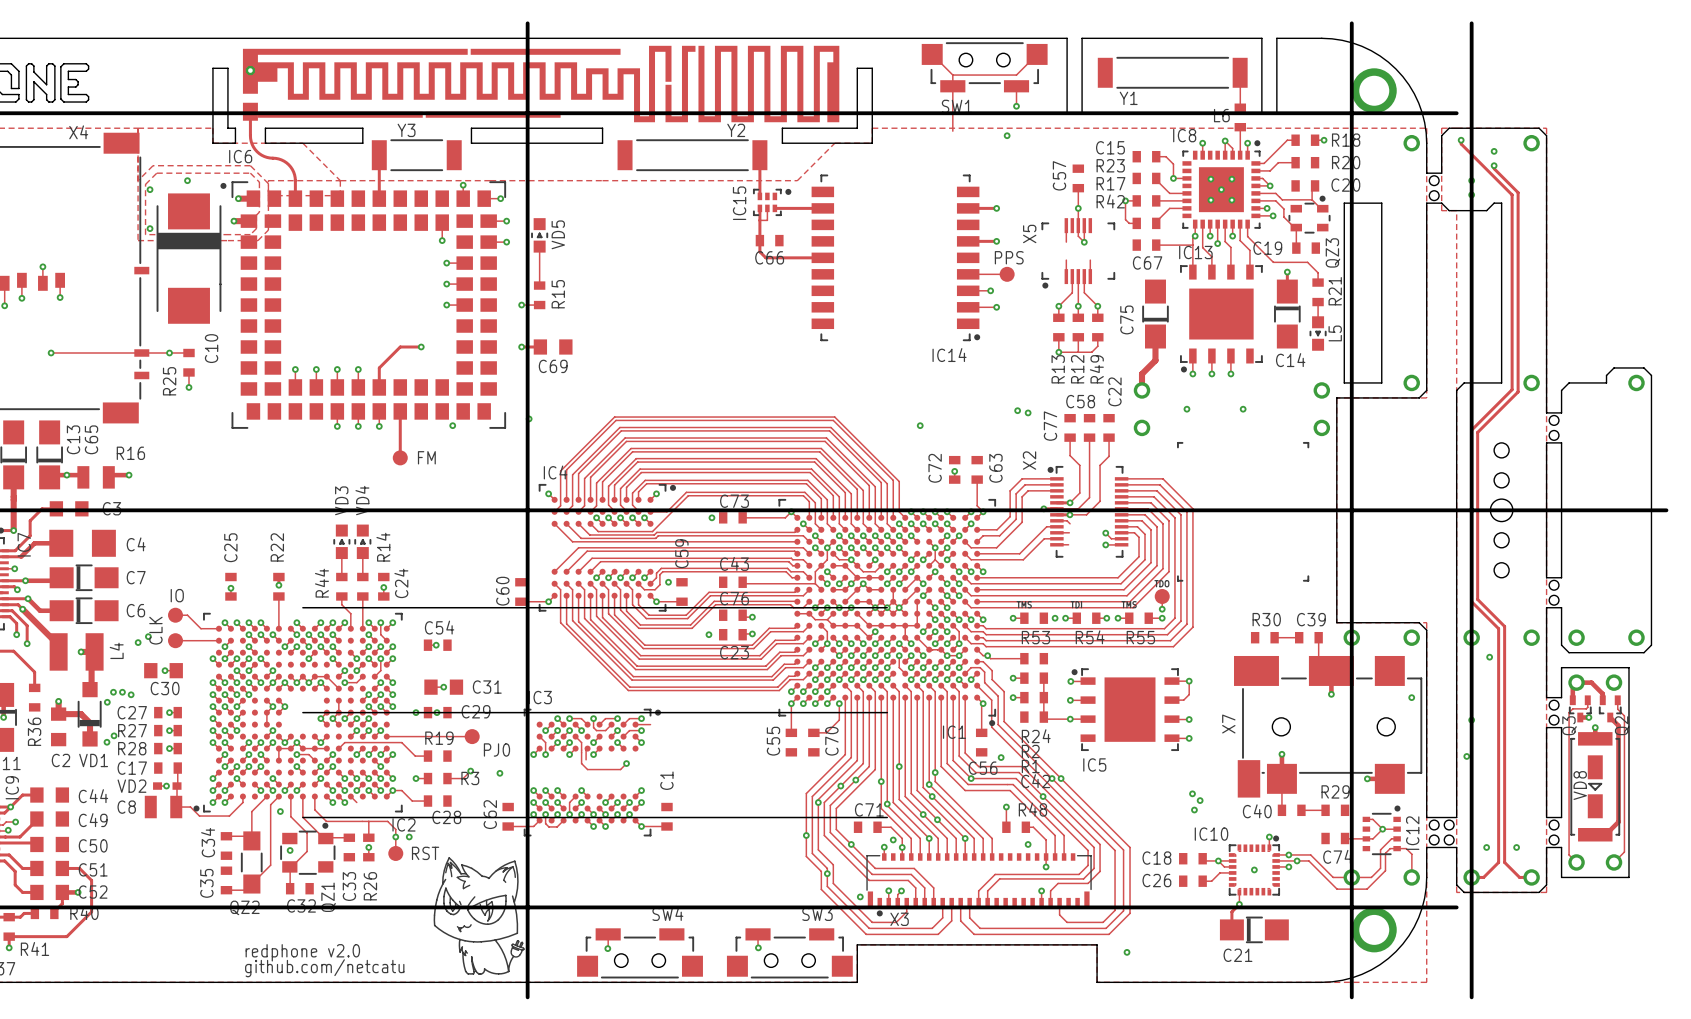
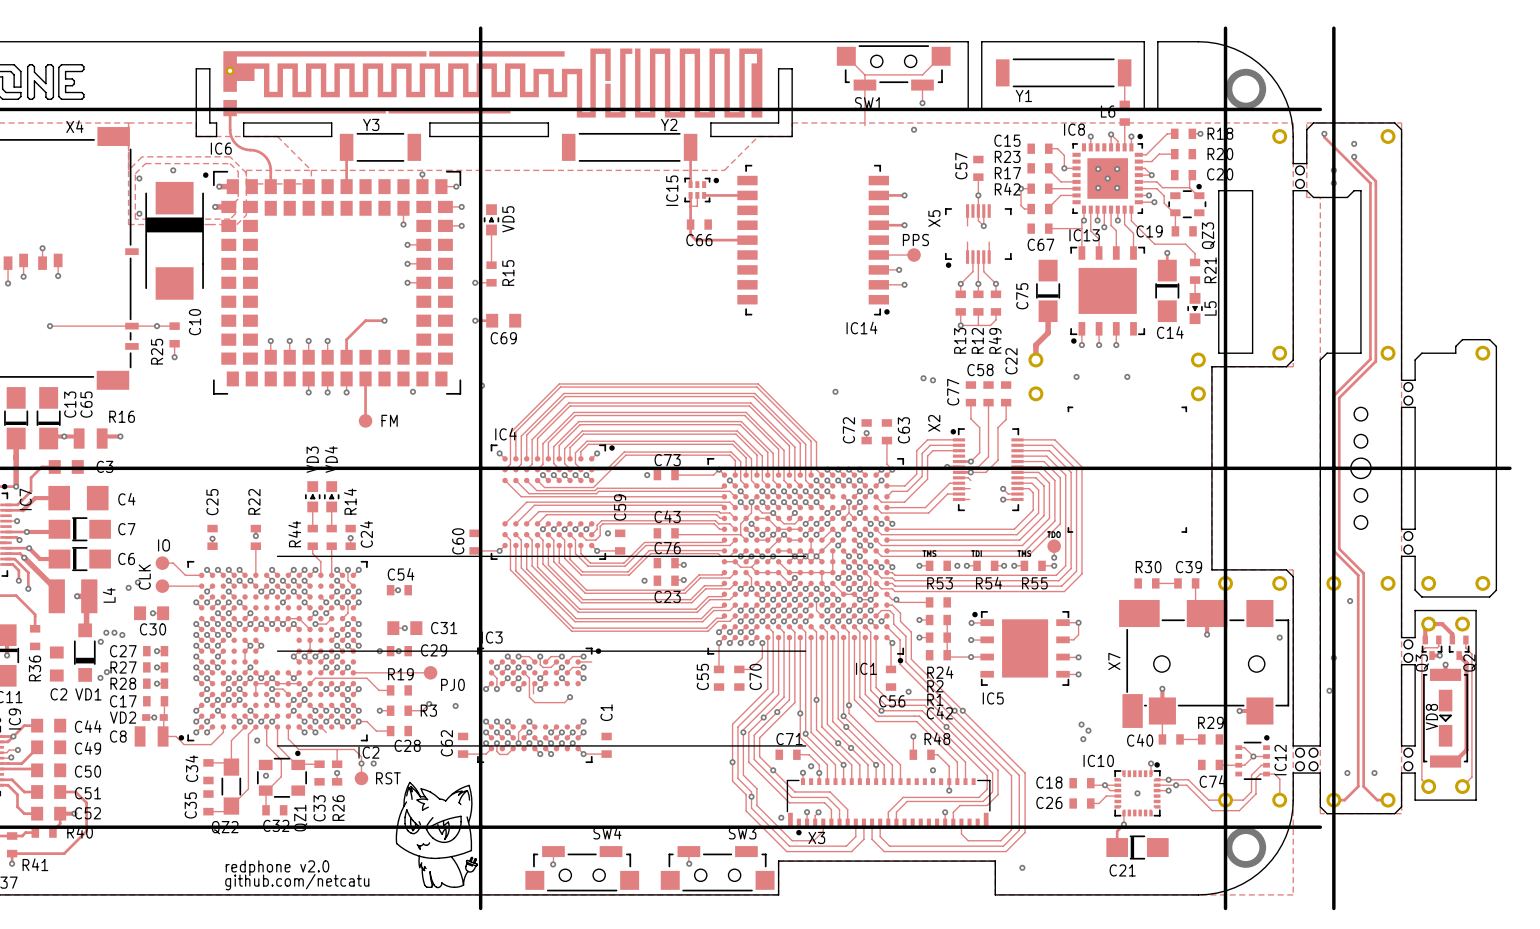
track: (58, 701) (58, 714) (81, 714) (90, 723) (90, 738) -> none
via: (58, 701) -> none

